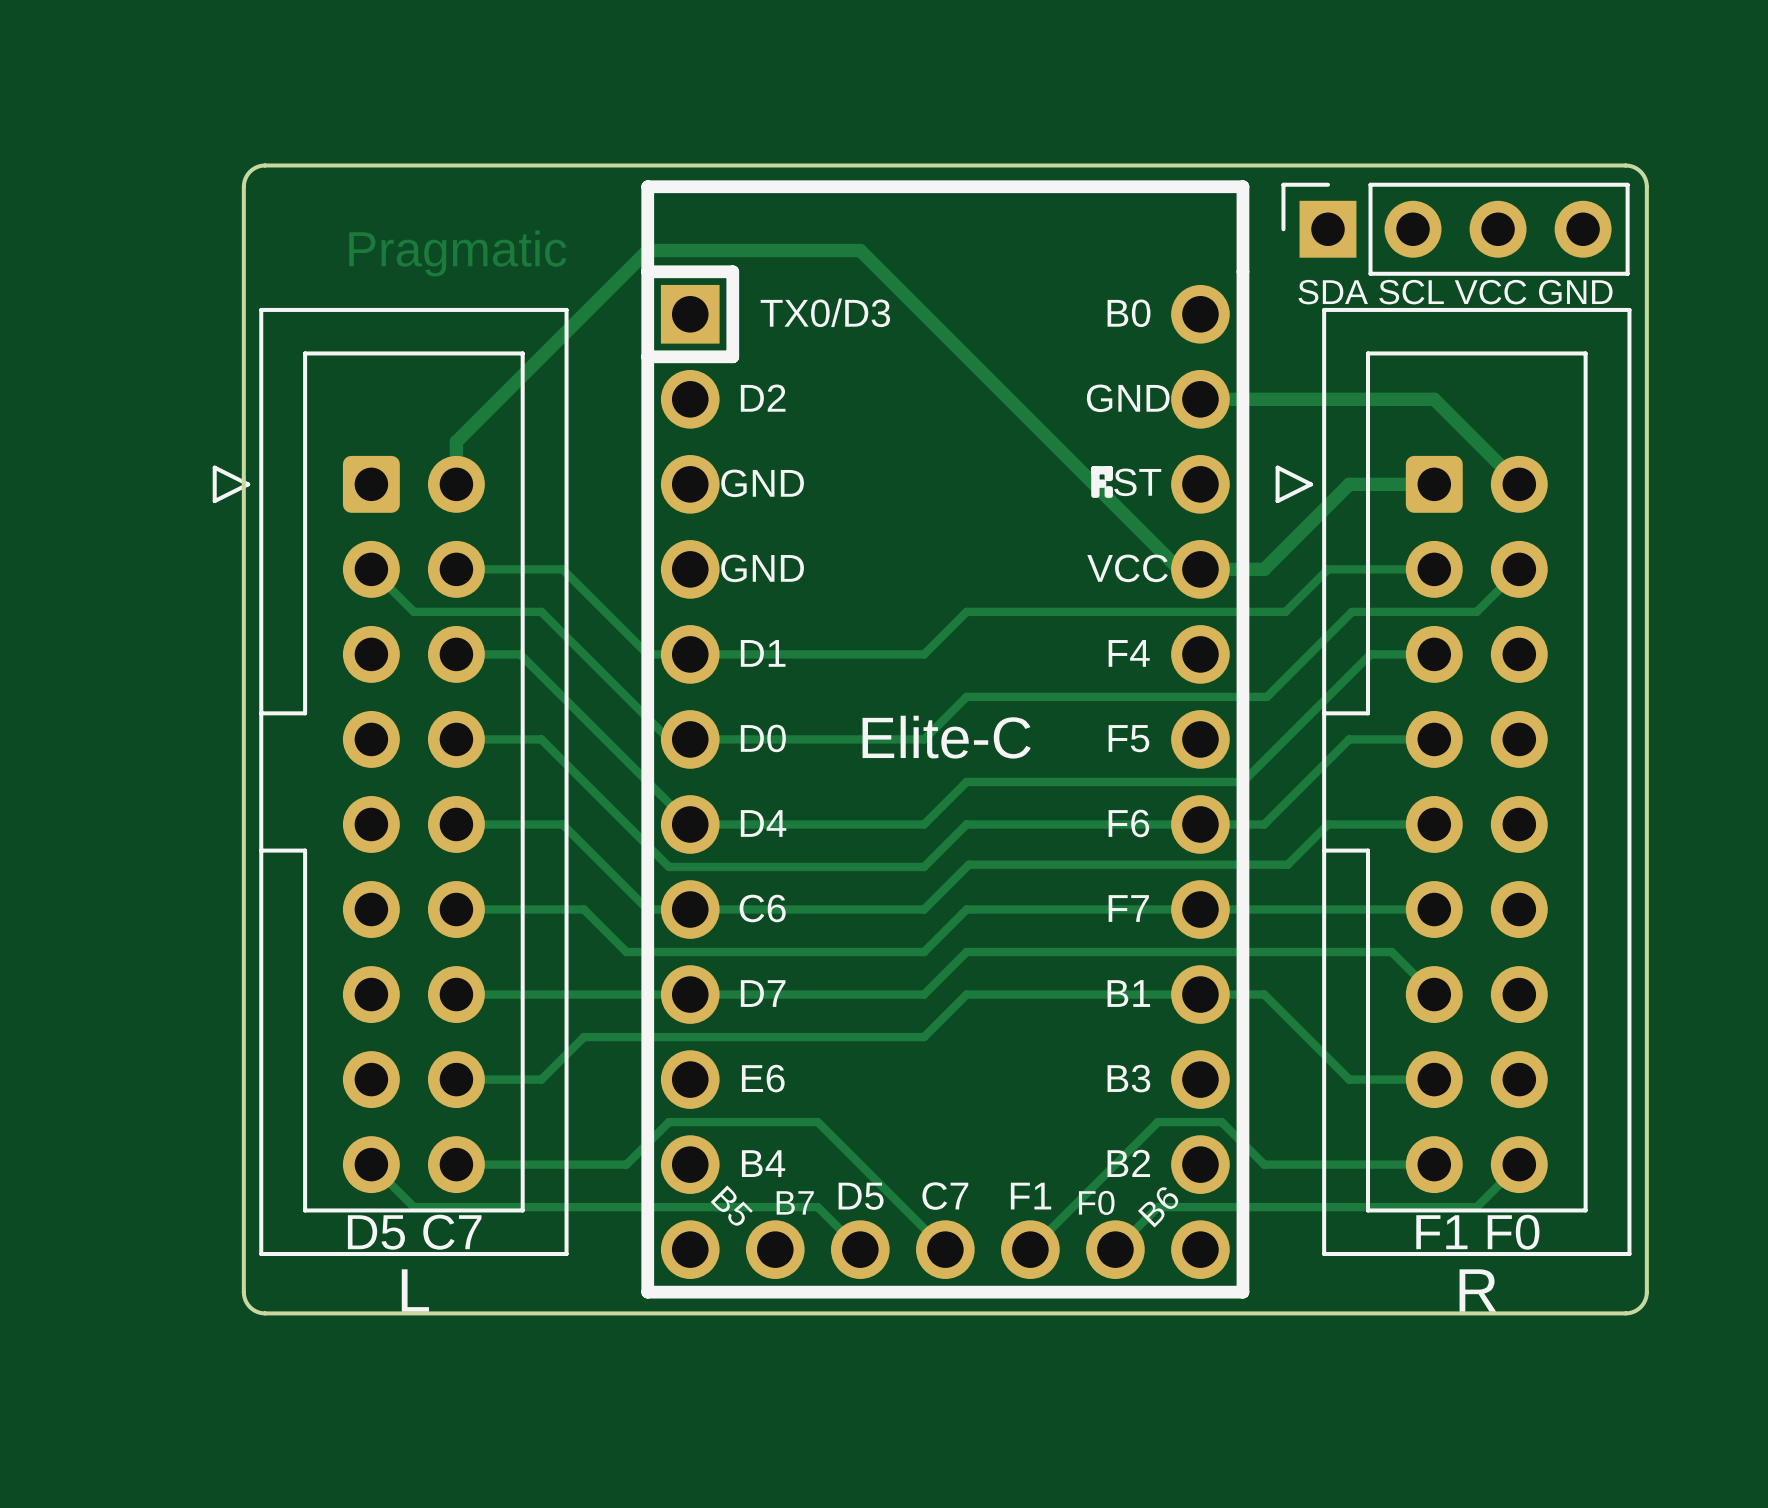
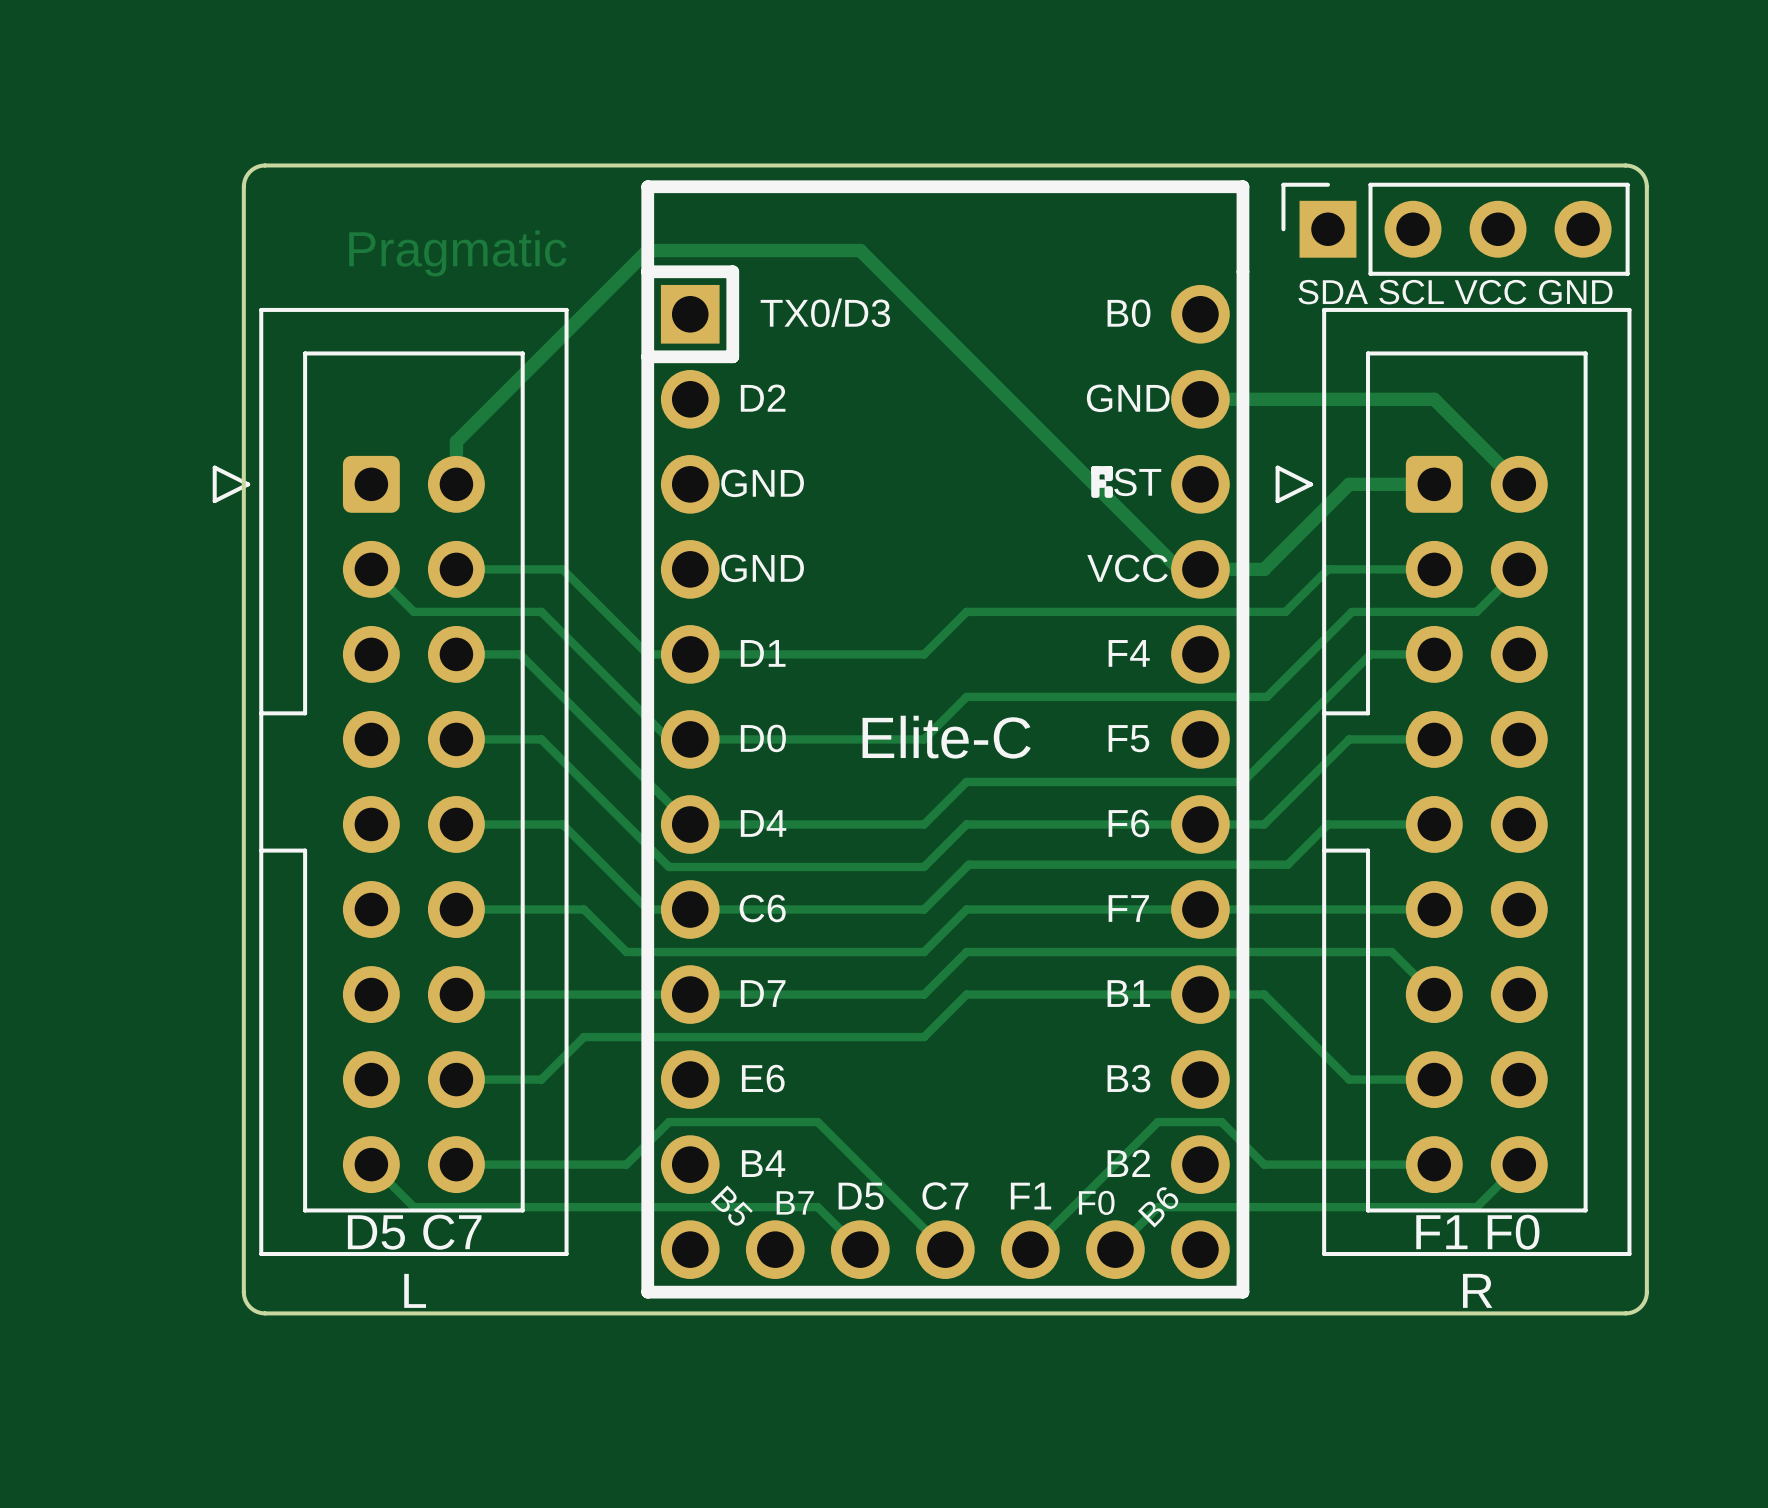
part value: L (415, 1290) -> none
text: none -> L (415, 1290)
part value: R (1477, 1290) -> none
text: none -> R (1477, 1290)

